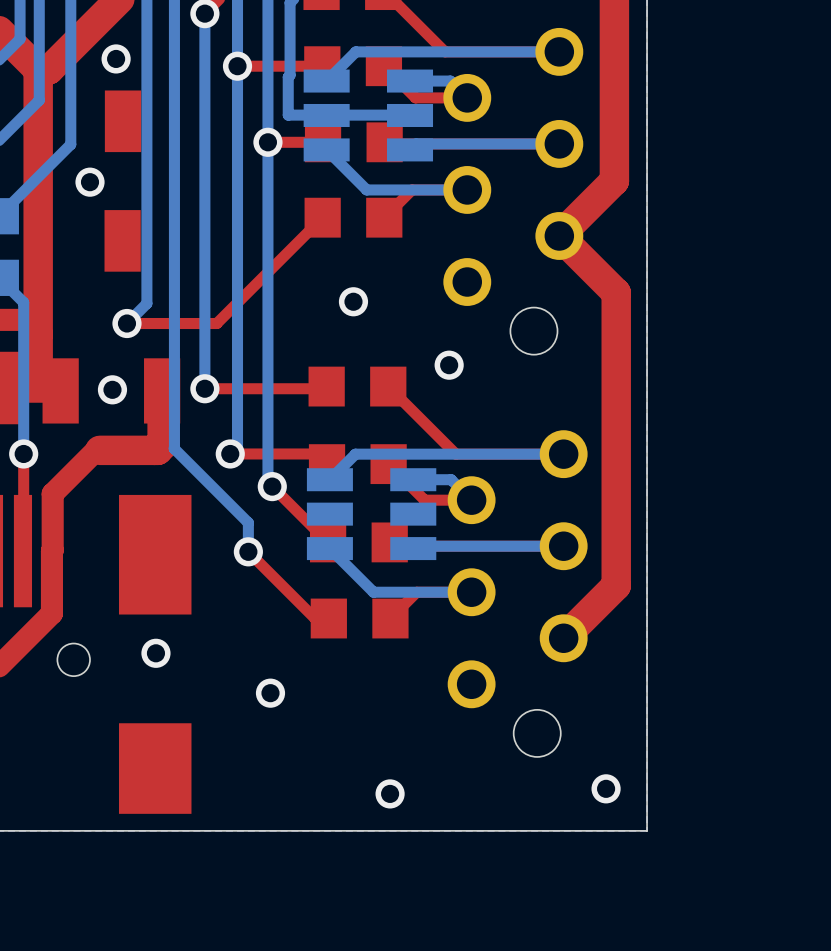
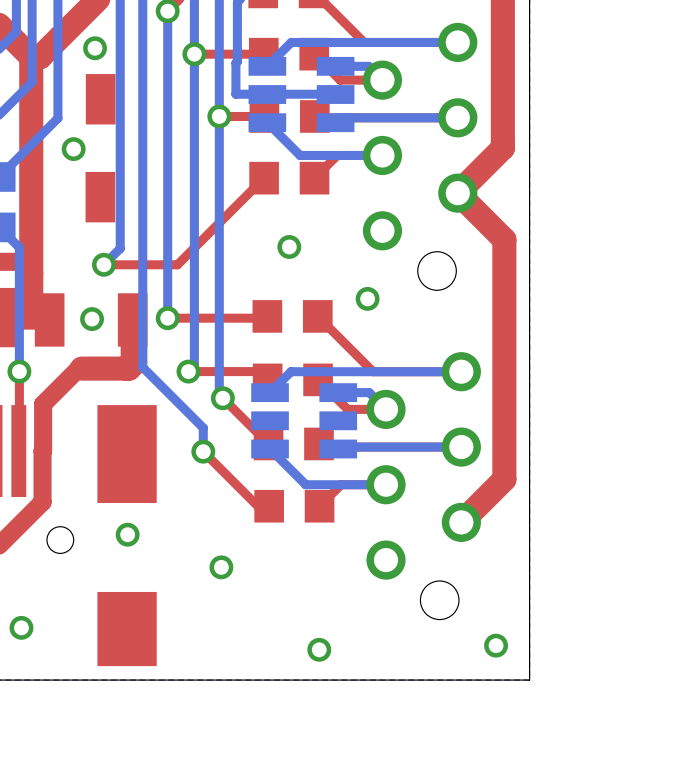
via: none -> (21, 627)

